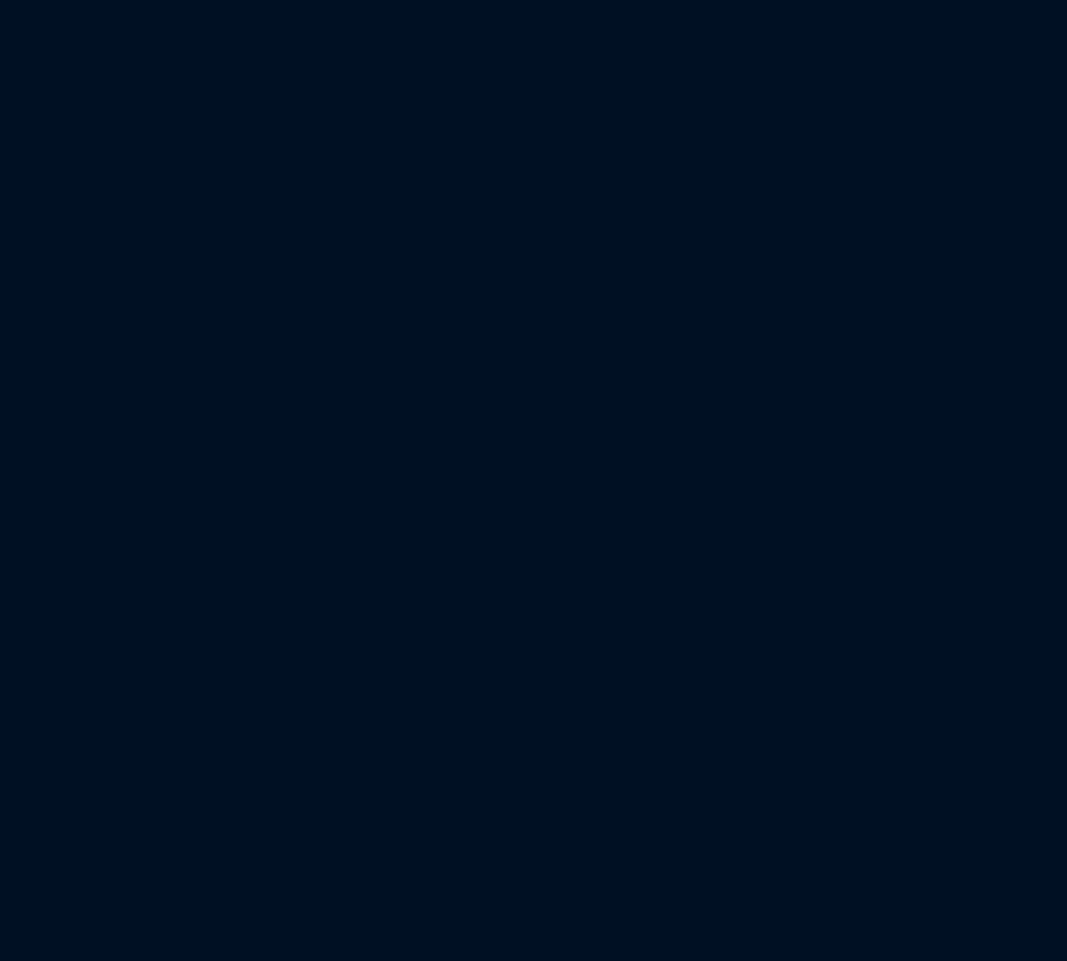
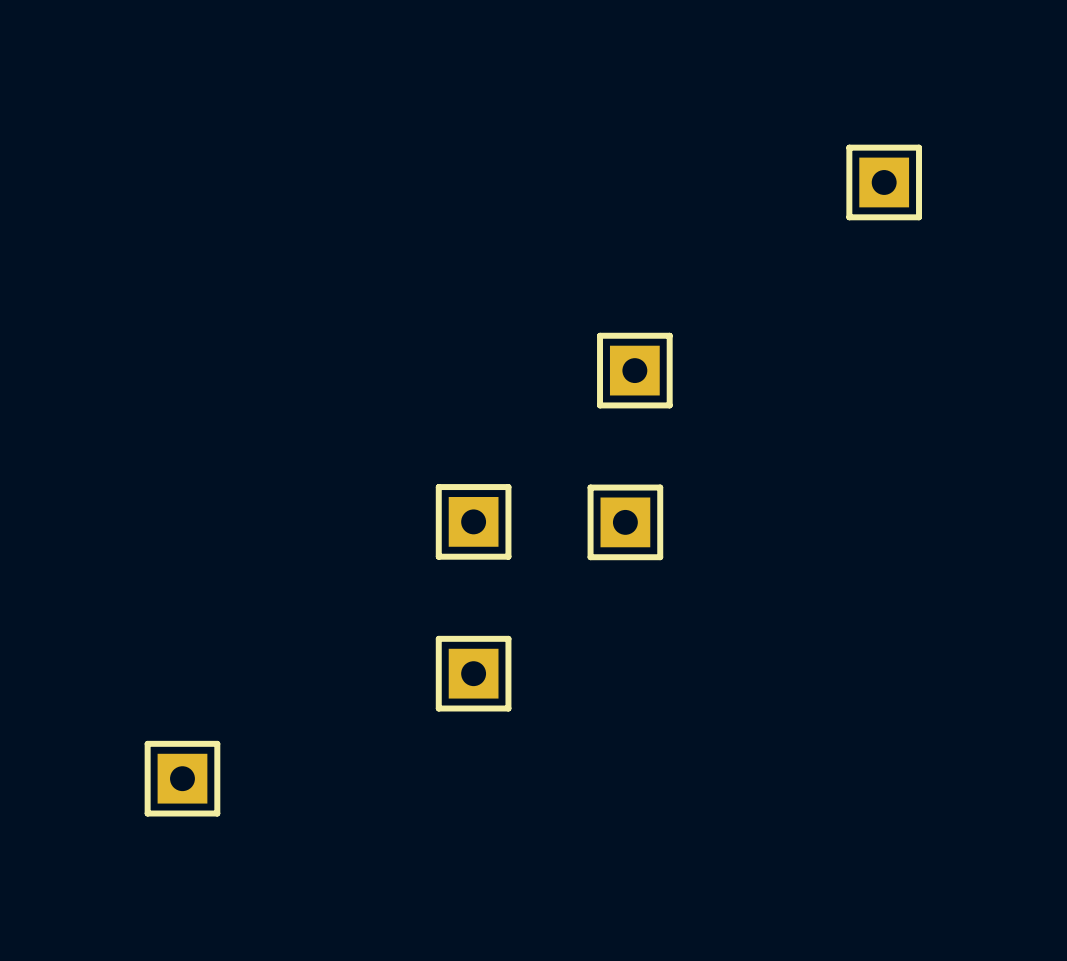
part: none -> (884, 182)
part: none -> (634, 370)
part: none -> (473, 521)
part: none -> (625, 522)
part: none -> (473, 673)
part: none -> (182, 778)

